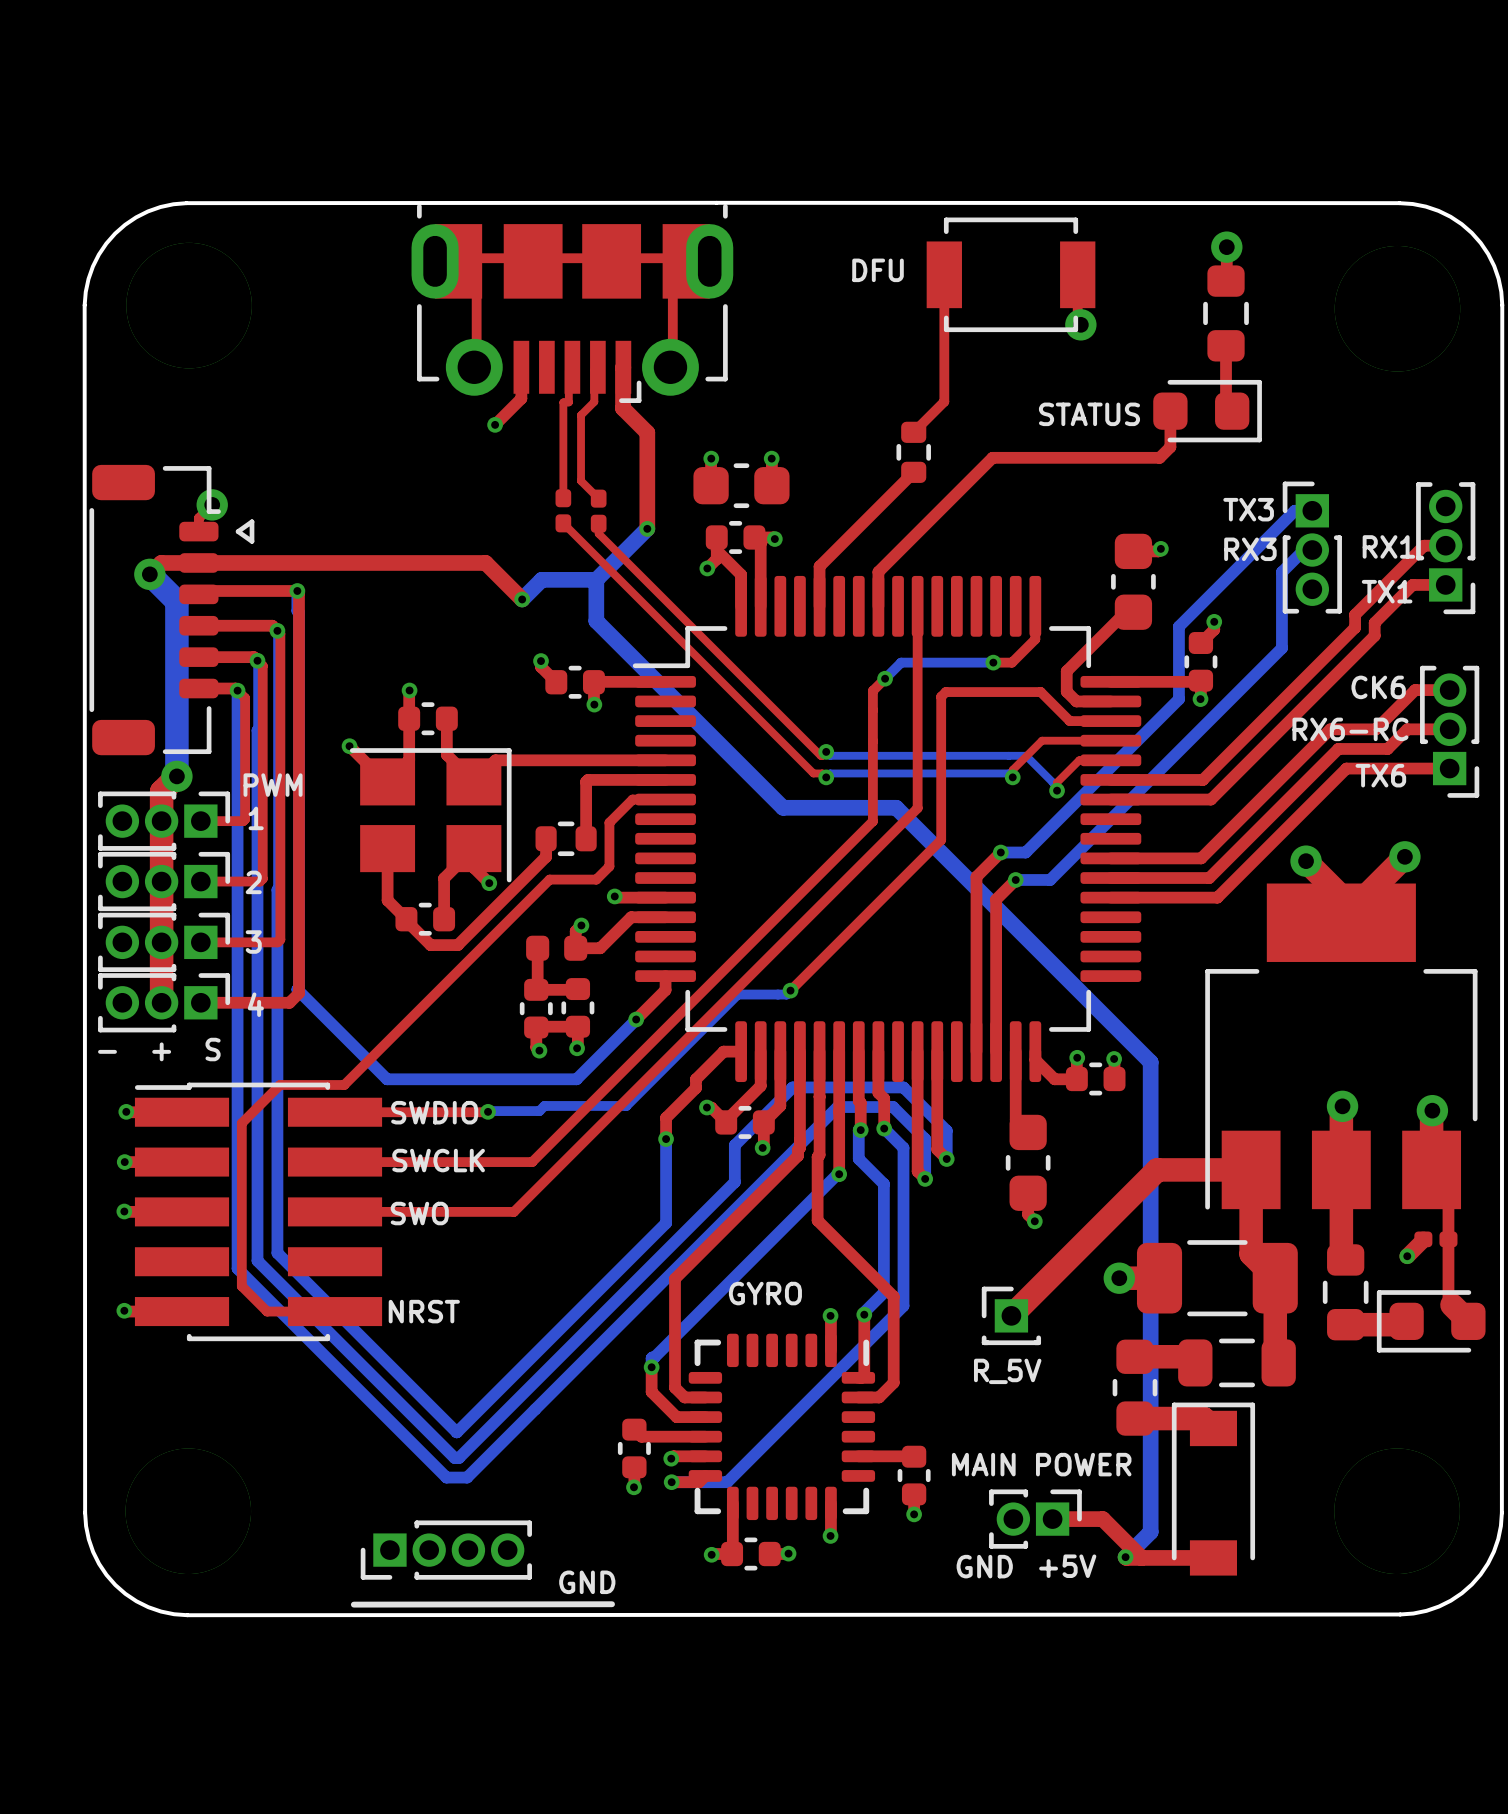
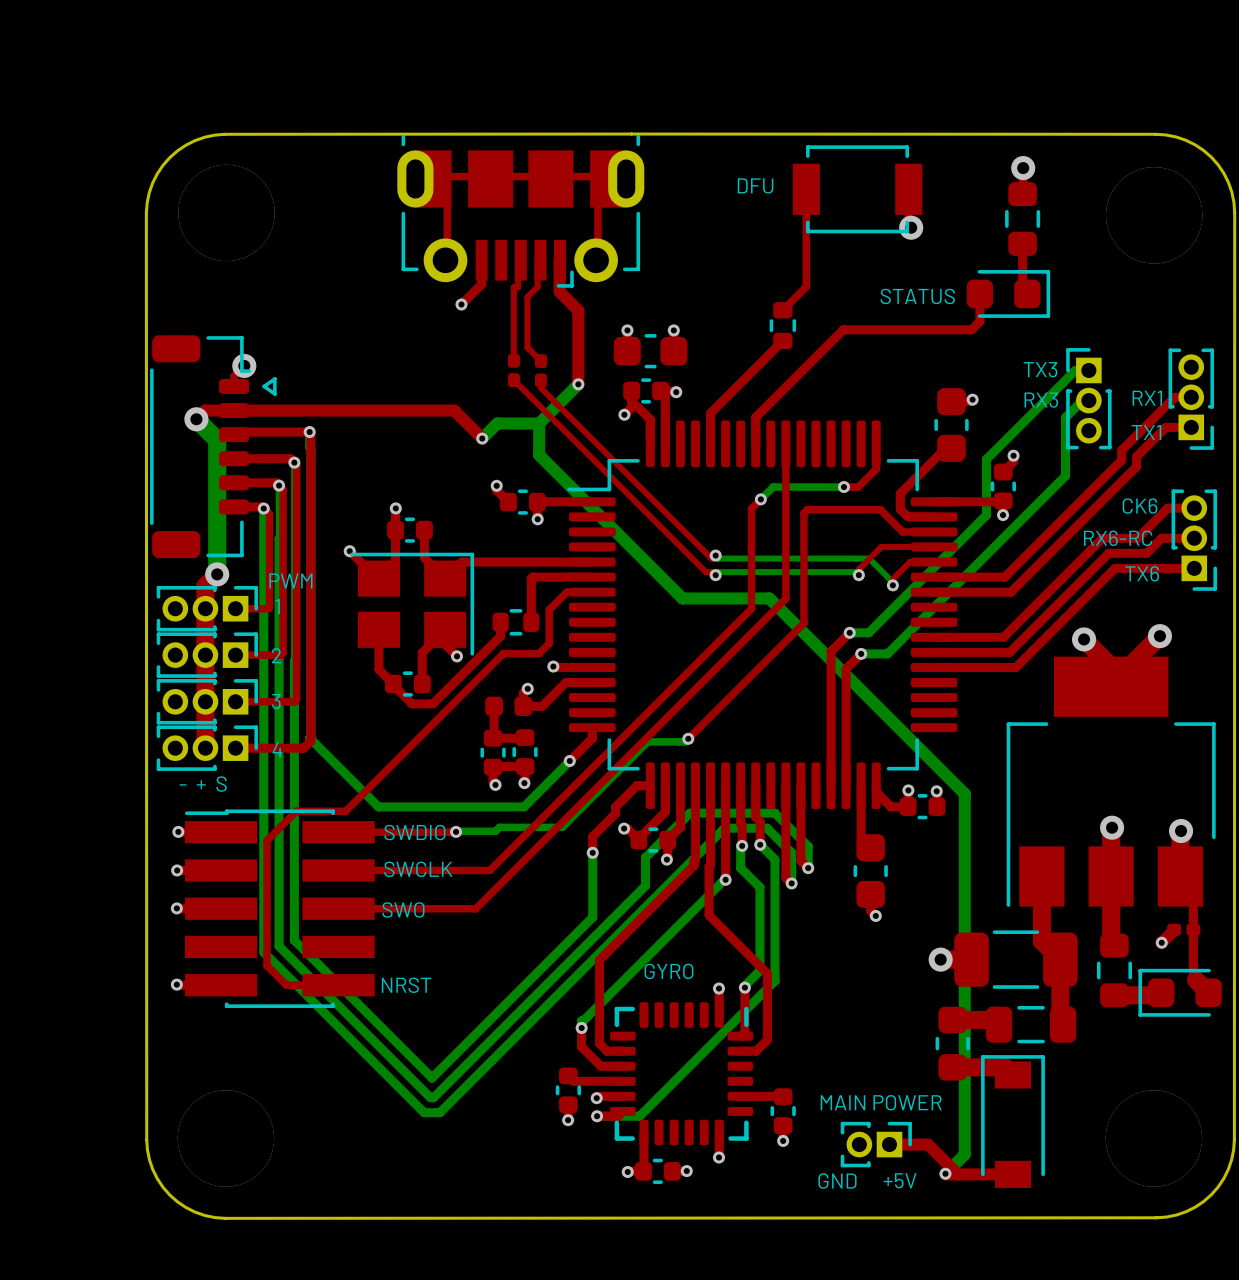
top track: (1251, 1169) (1157, 1169) (1011, 1315) -> none
part: (1011, 1315) -> none
text: R_5V (1007, 1371) -> none
part: (446, 1550) -> none
text: GND (587, 1582) -> none
line: (612, 1604) (353, 1604) -> none

